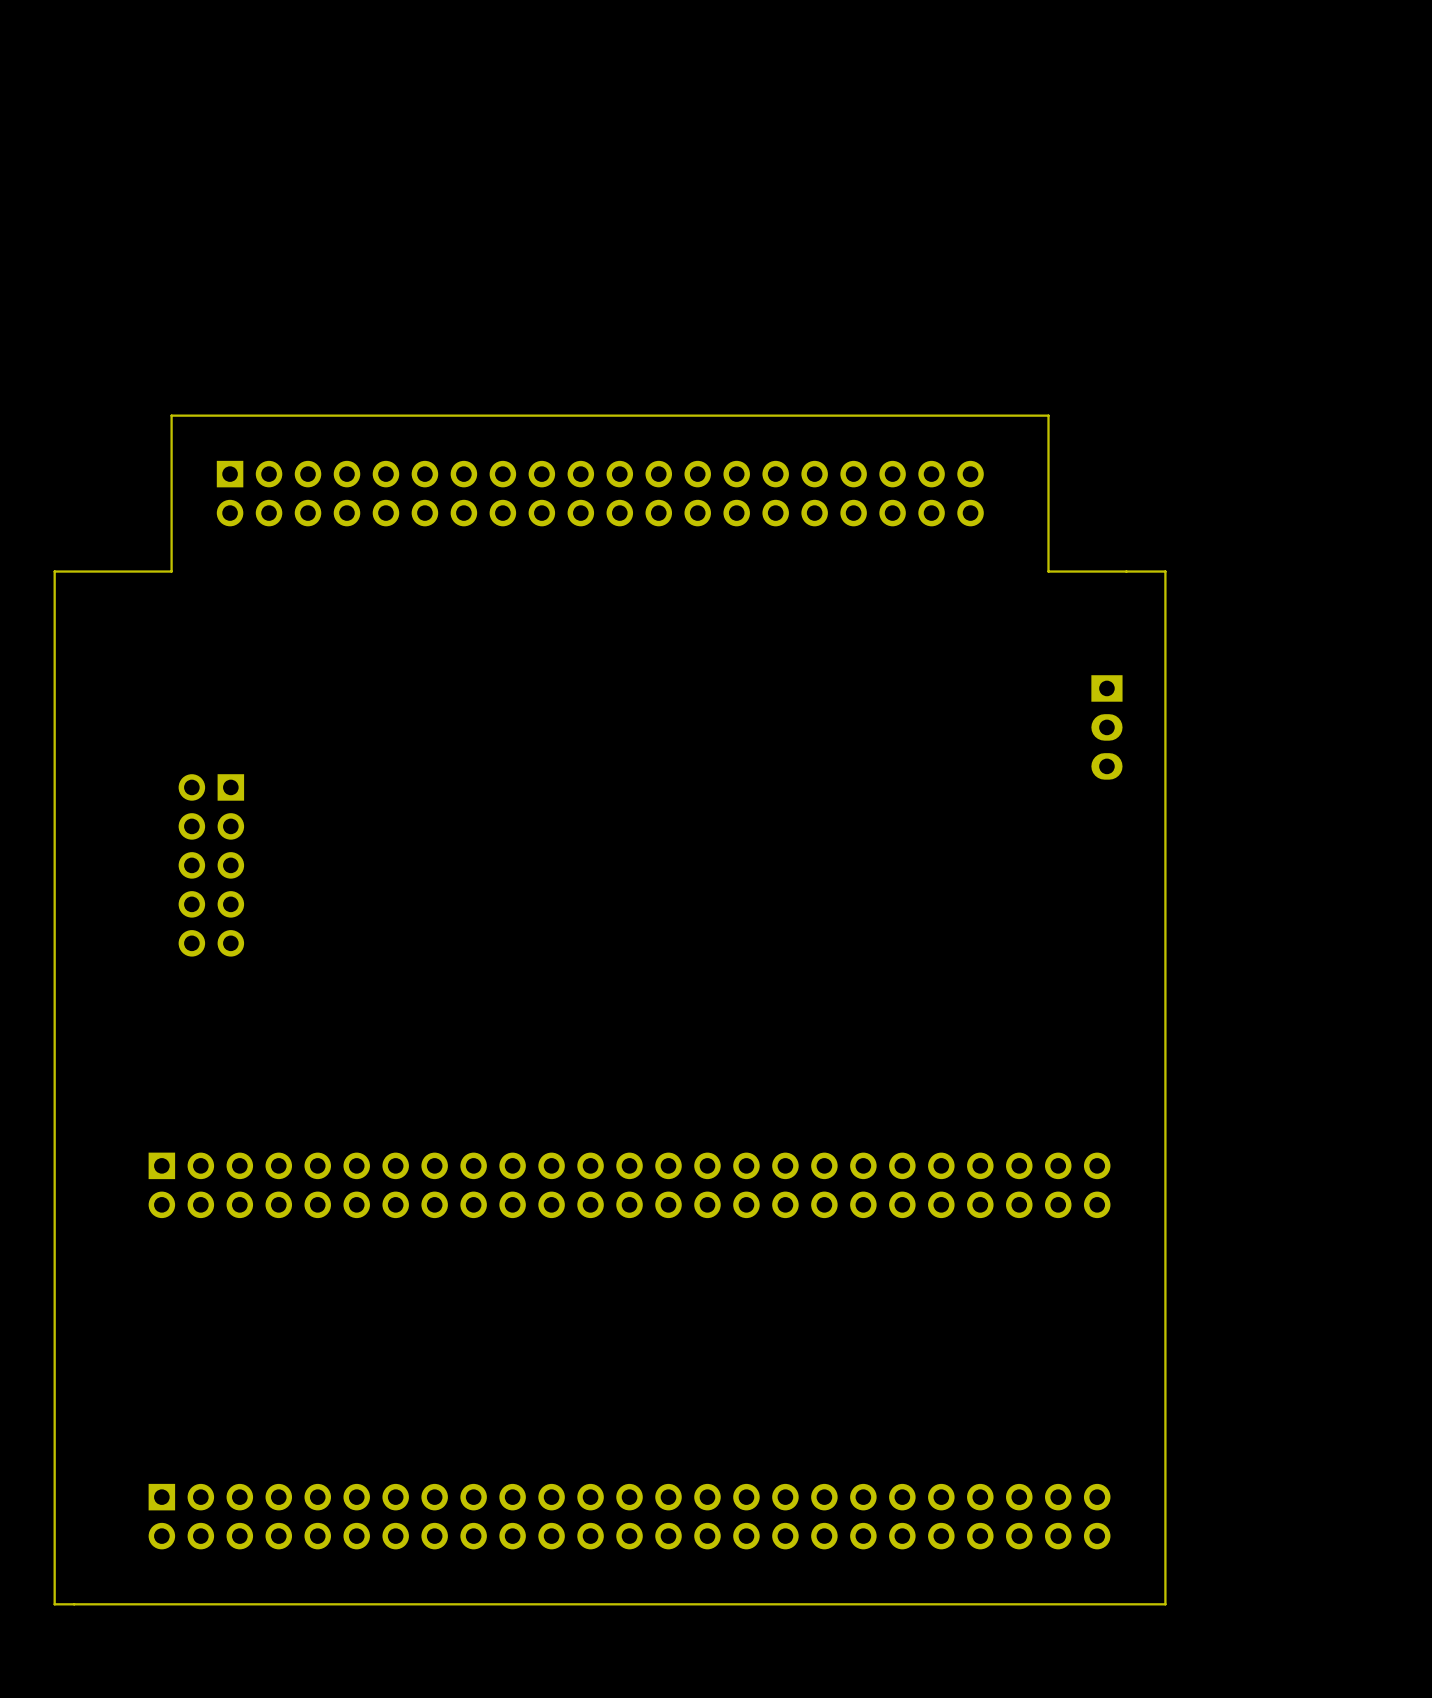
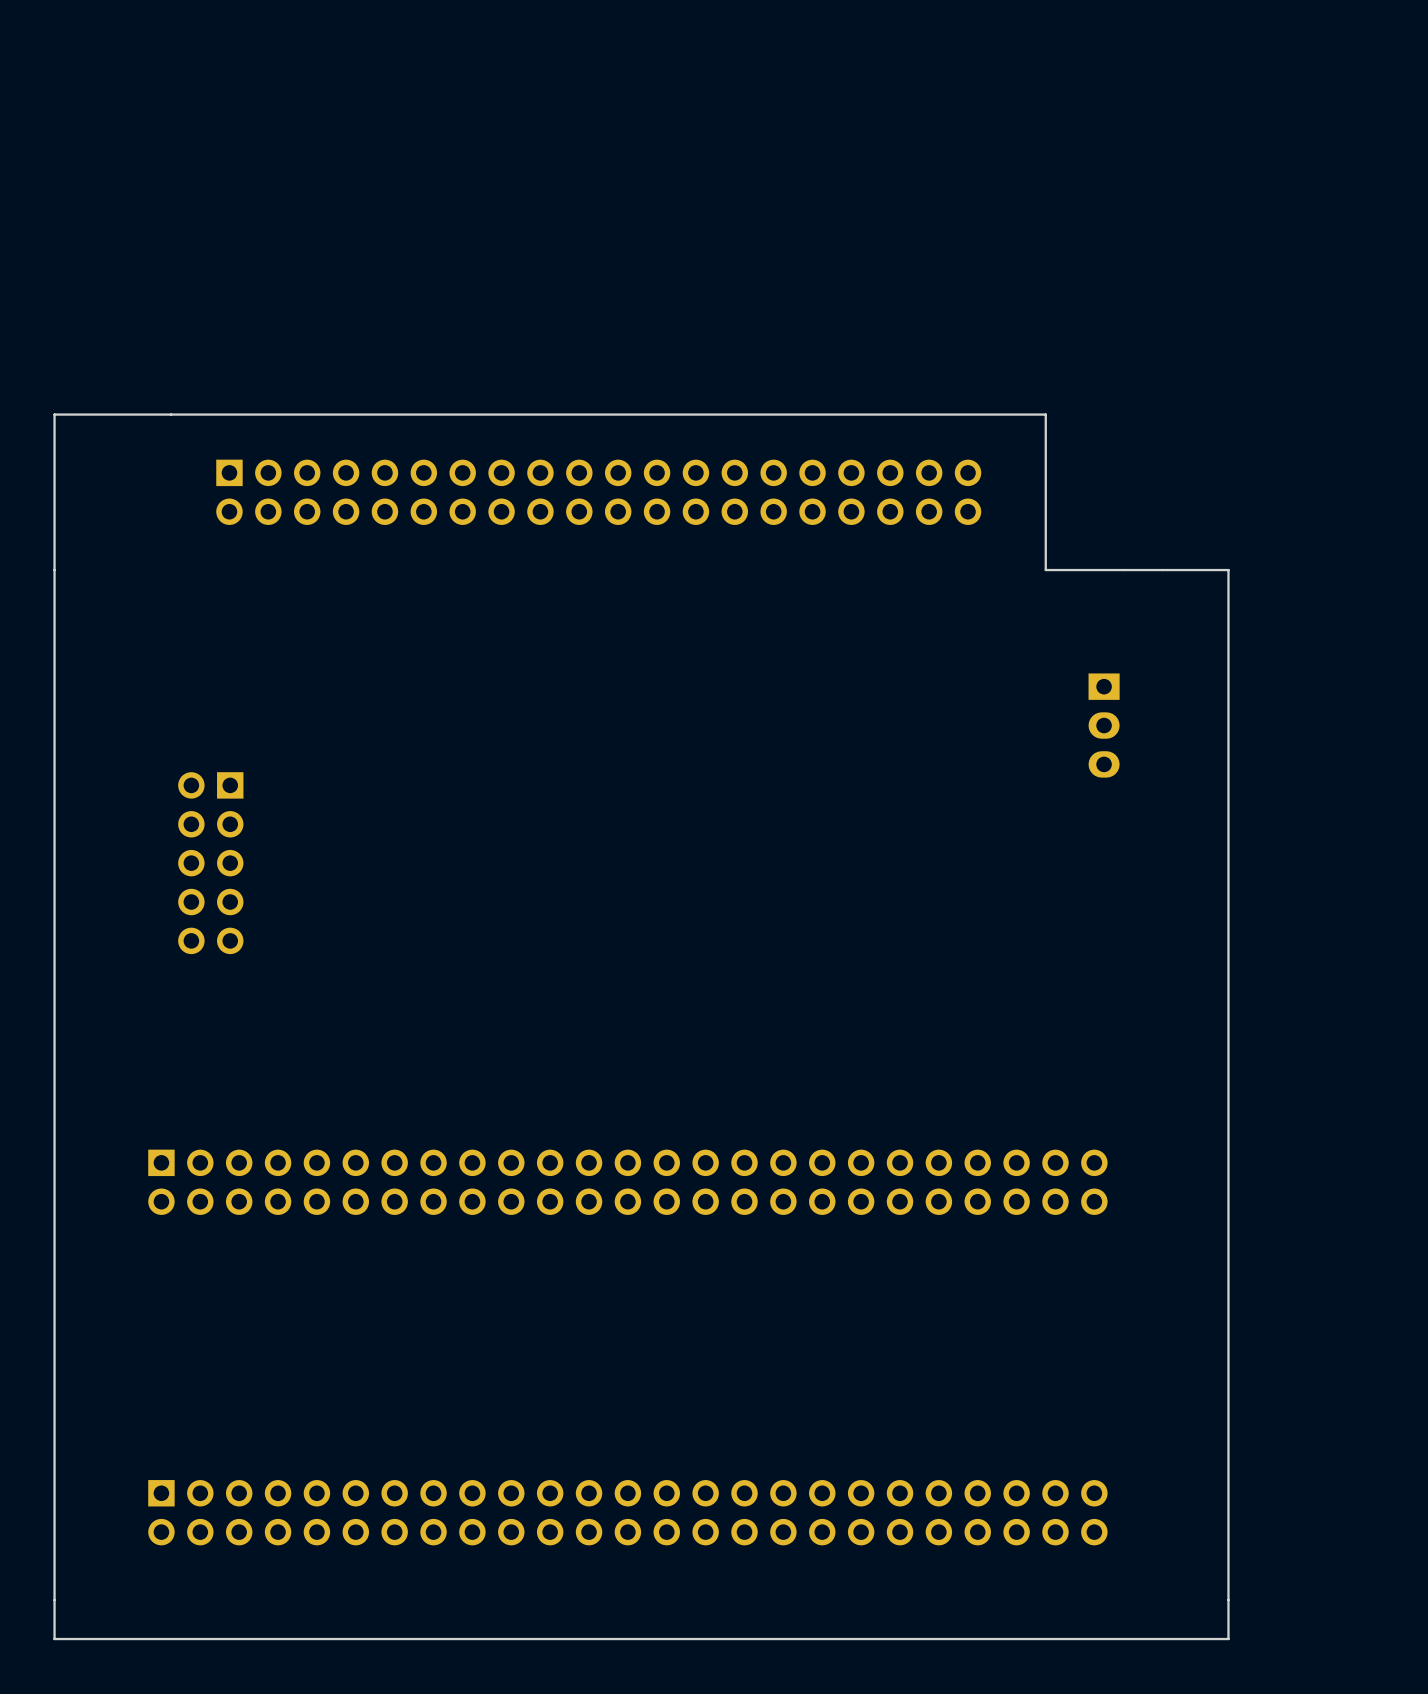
board edge: (171, 415) (171, 571) (54, 571) -> (171, 414) (54, 414) (54, 570)
board edge: (1165, 571) (1165, 1604) (54, 1604) -> (1162, 570) (1228, 570) (1228, 1639) (54, 1639) (54, 1600)

